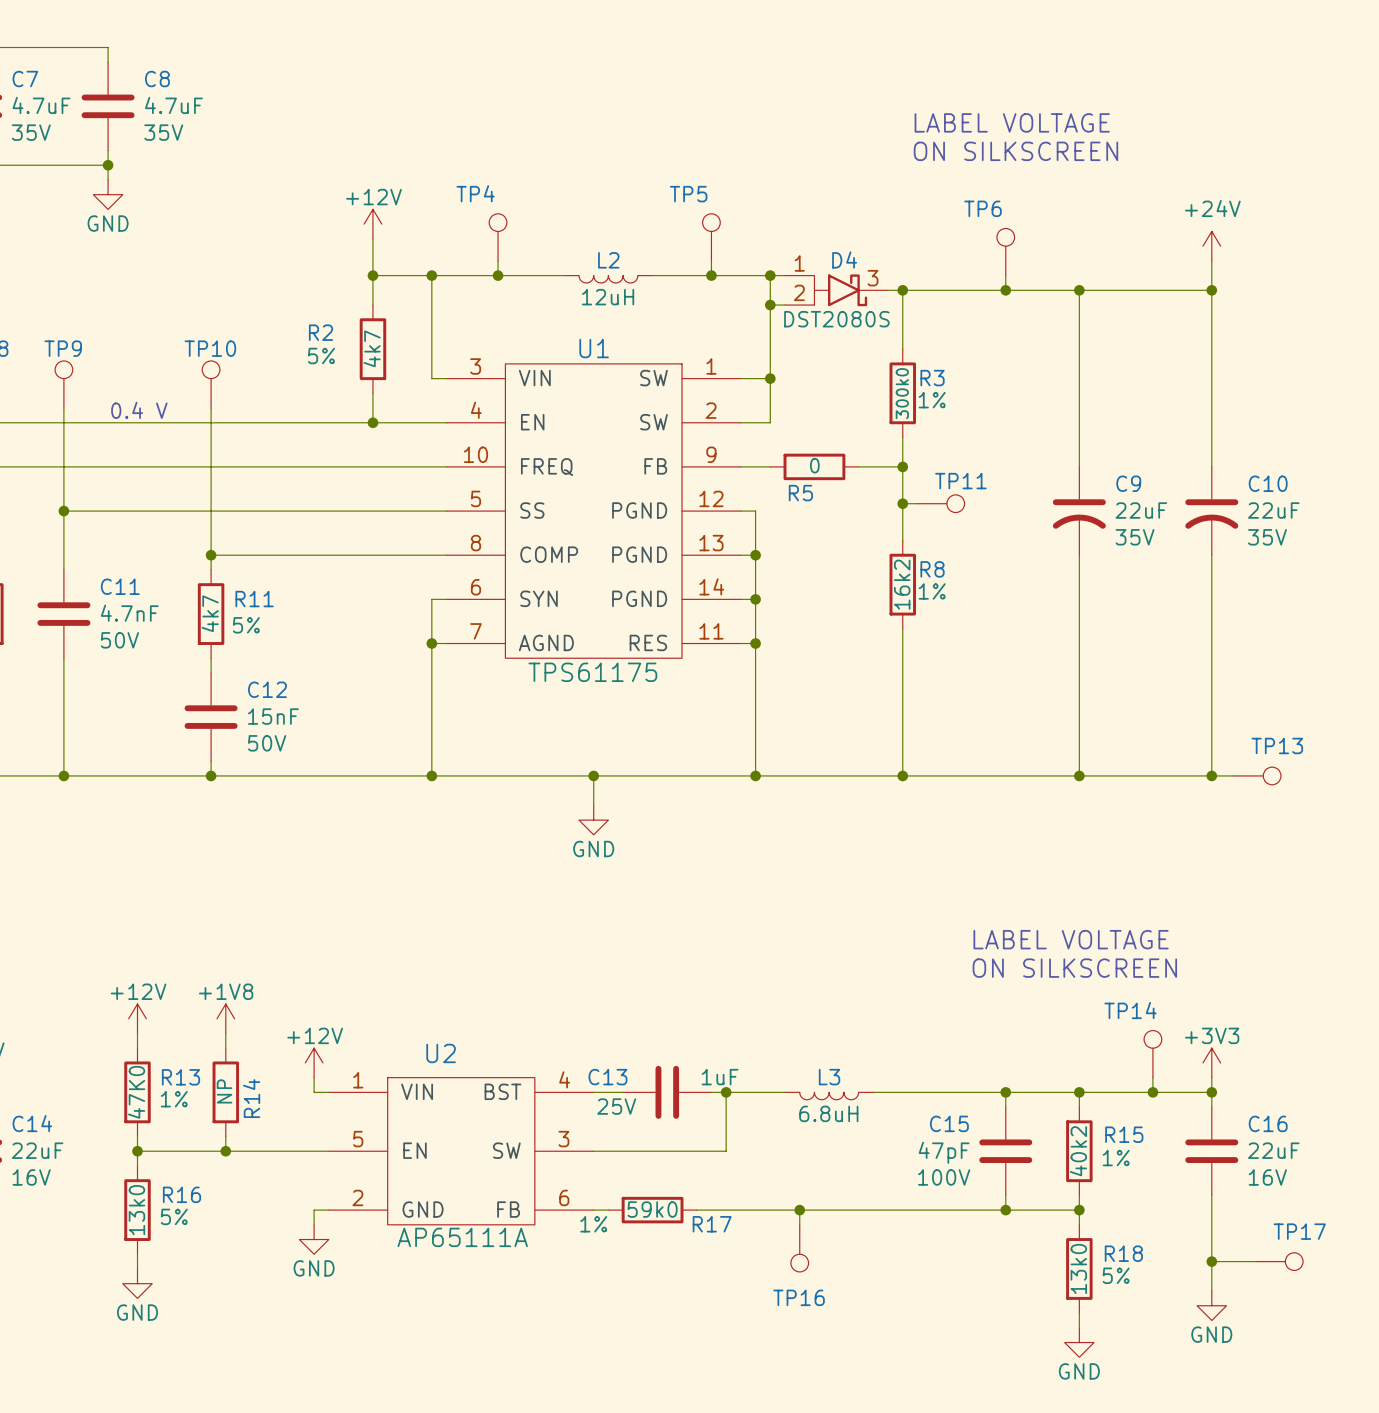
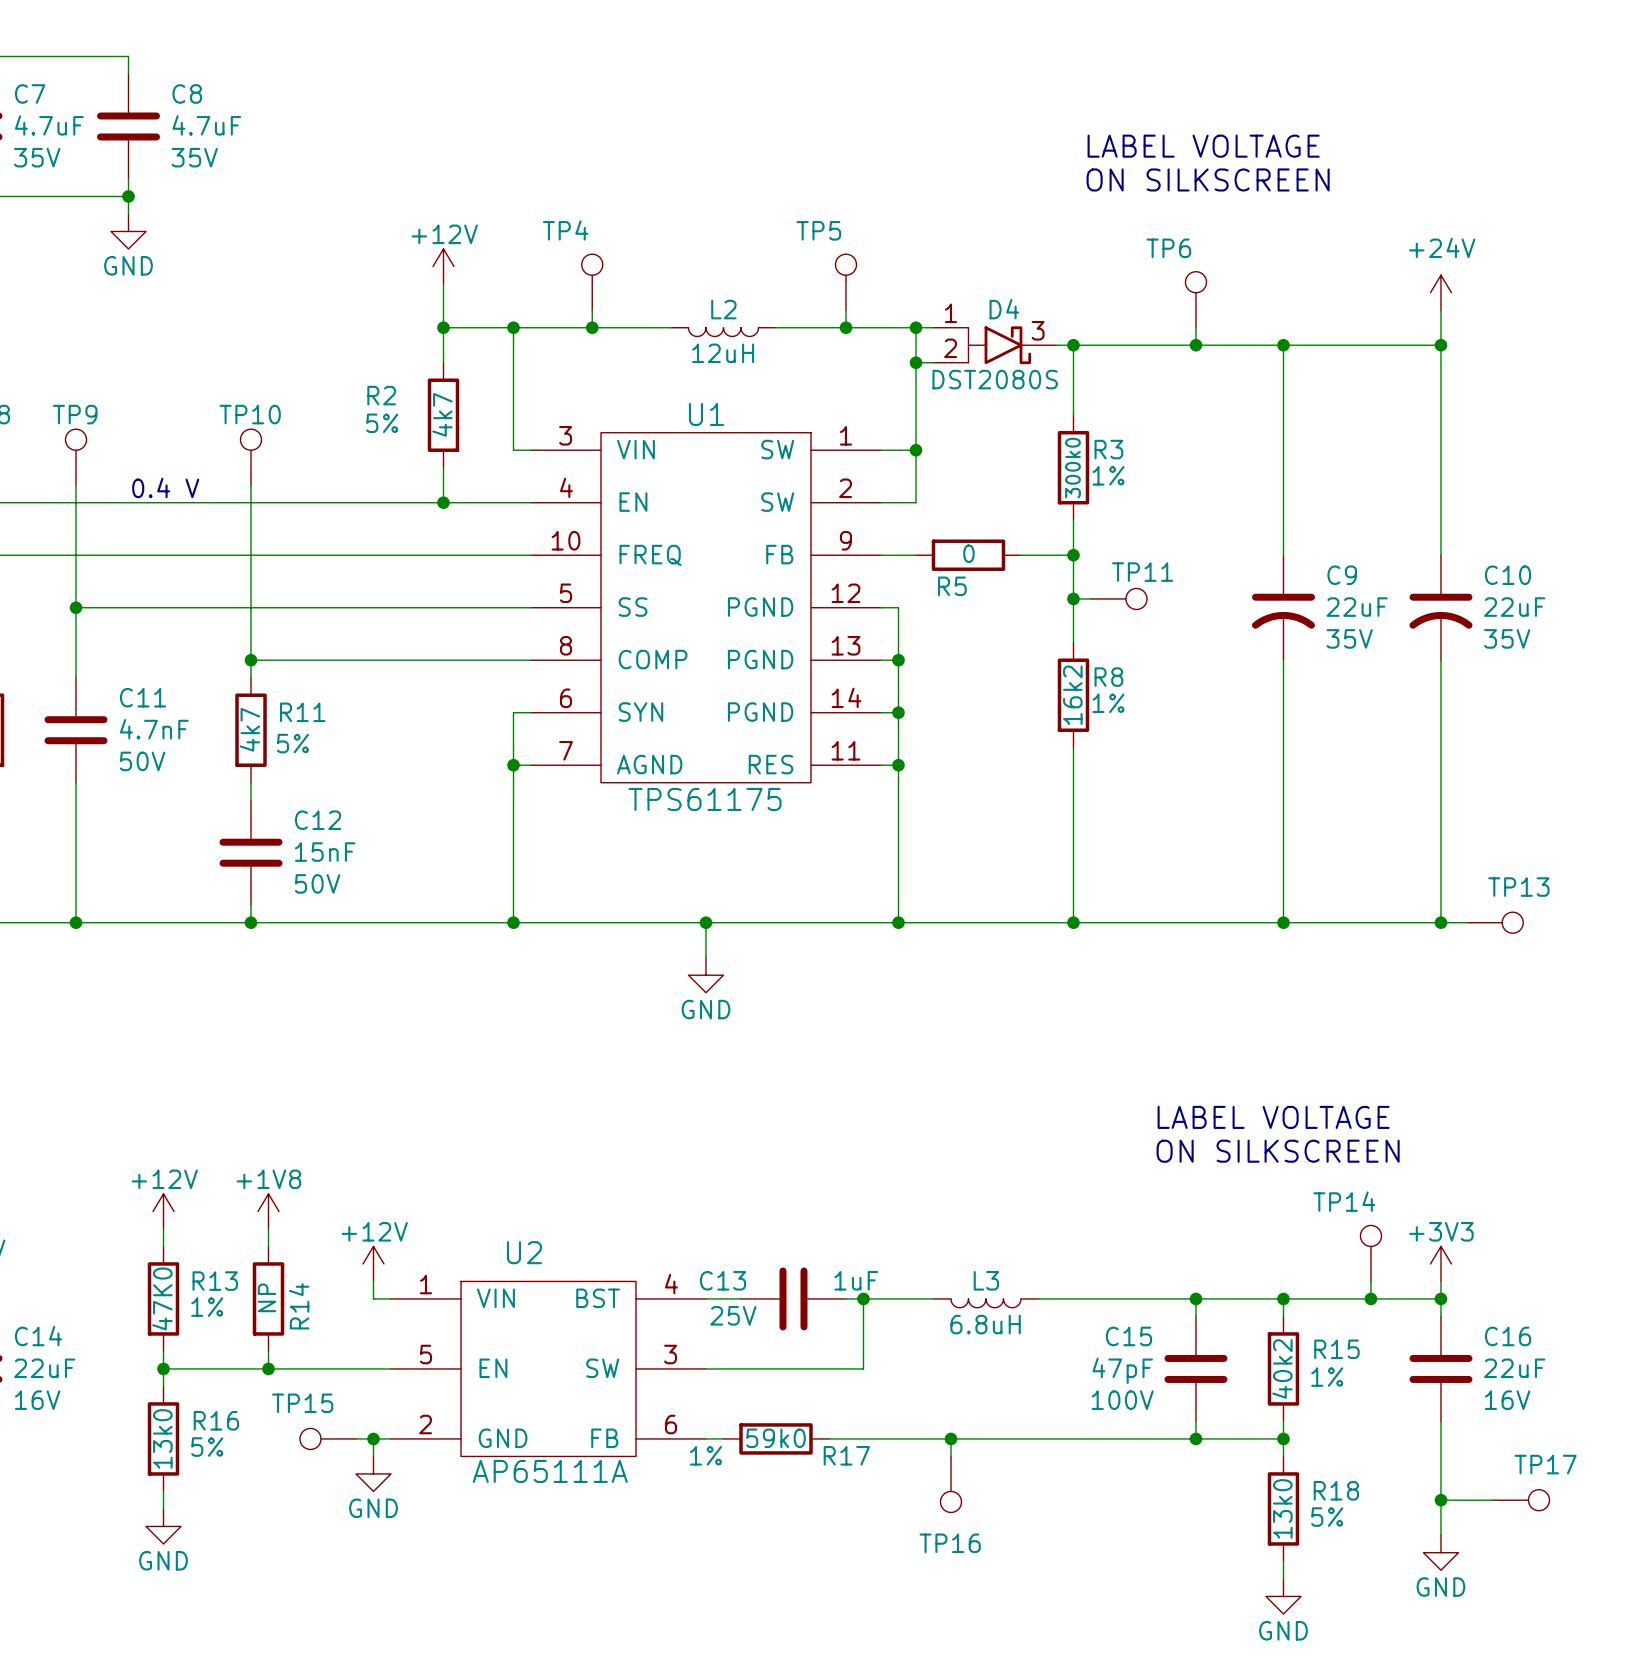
TP15: none -> (328, 1438)
wire: none -> (356, 1438) (373, 1438)
junction: none -> (373, 1438)

